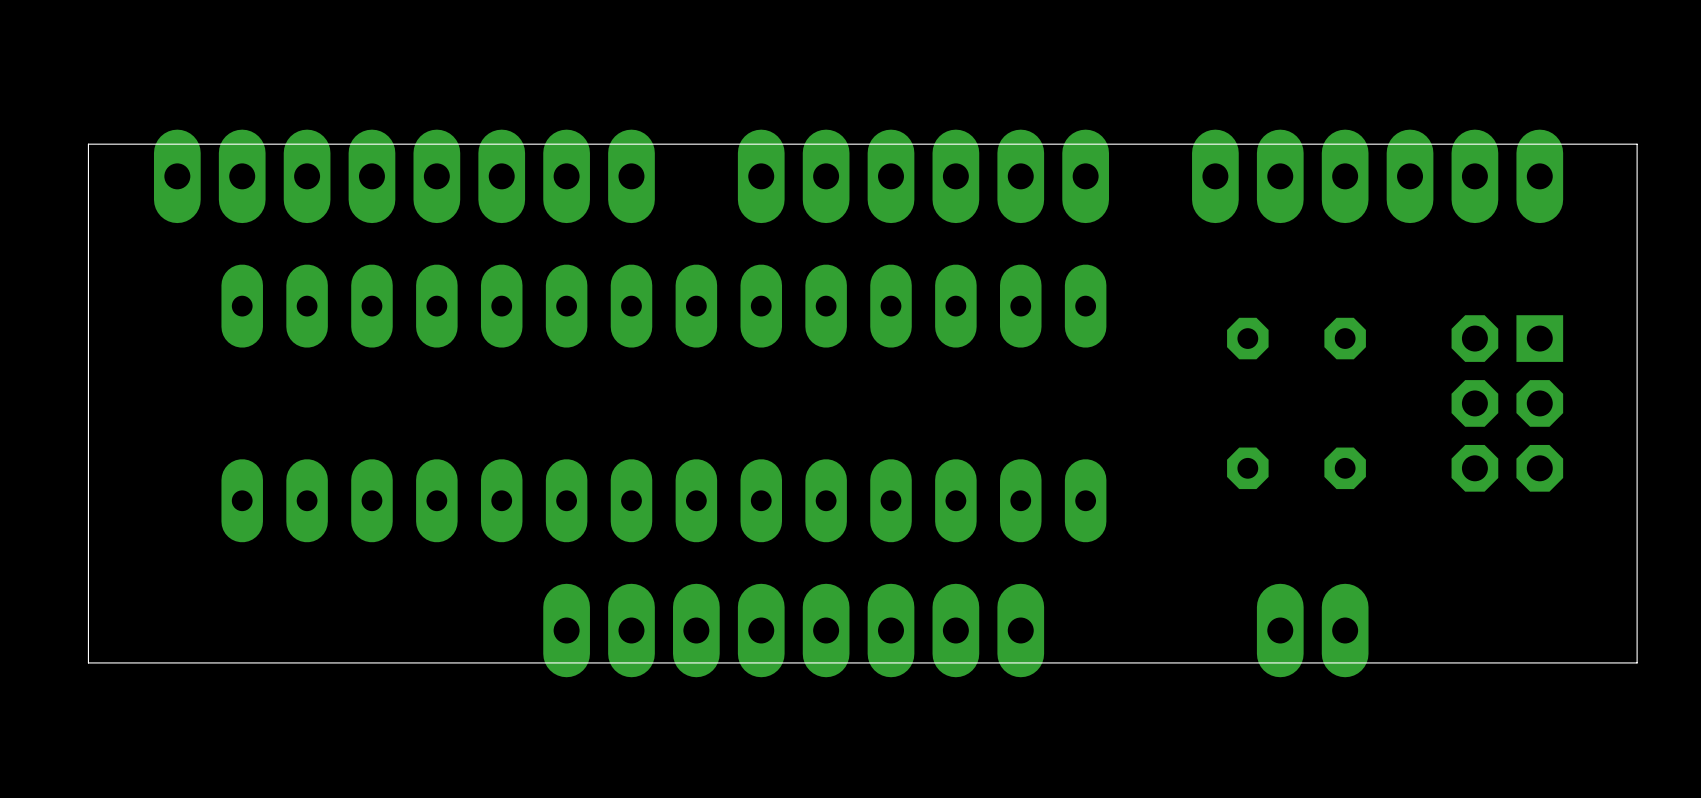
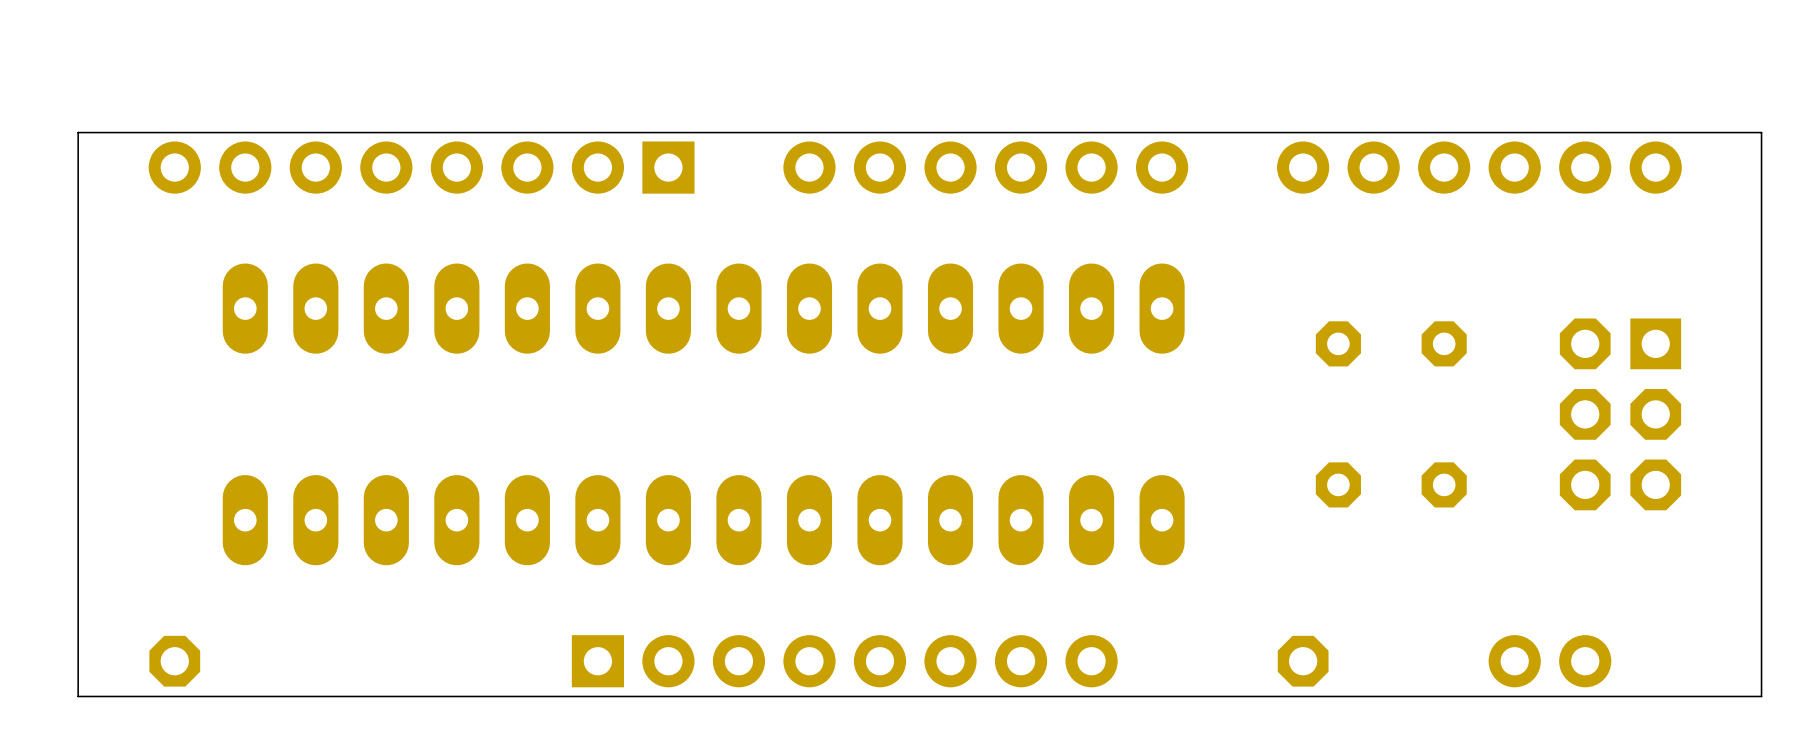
part footprint: [153, 129, 655, 224] -> [148, 141, 695, 194]
part footprint: [737, 129, 1109, 224] -> [783, 141, 1189, 194]
part footprint: [1192, 129, 1564, 224] -> [1277, 141, 1682, 194]
part footprint: [543, 583, 1045, 678] -> [571, 635, 1118, 688]
part: none -> (174, 661)
part: none -> (1303, 661)
part: (1312, 630) -> none
part: none -> (1549, 661)

